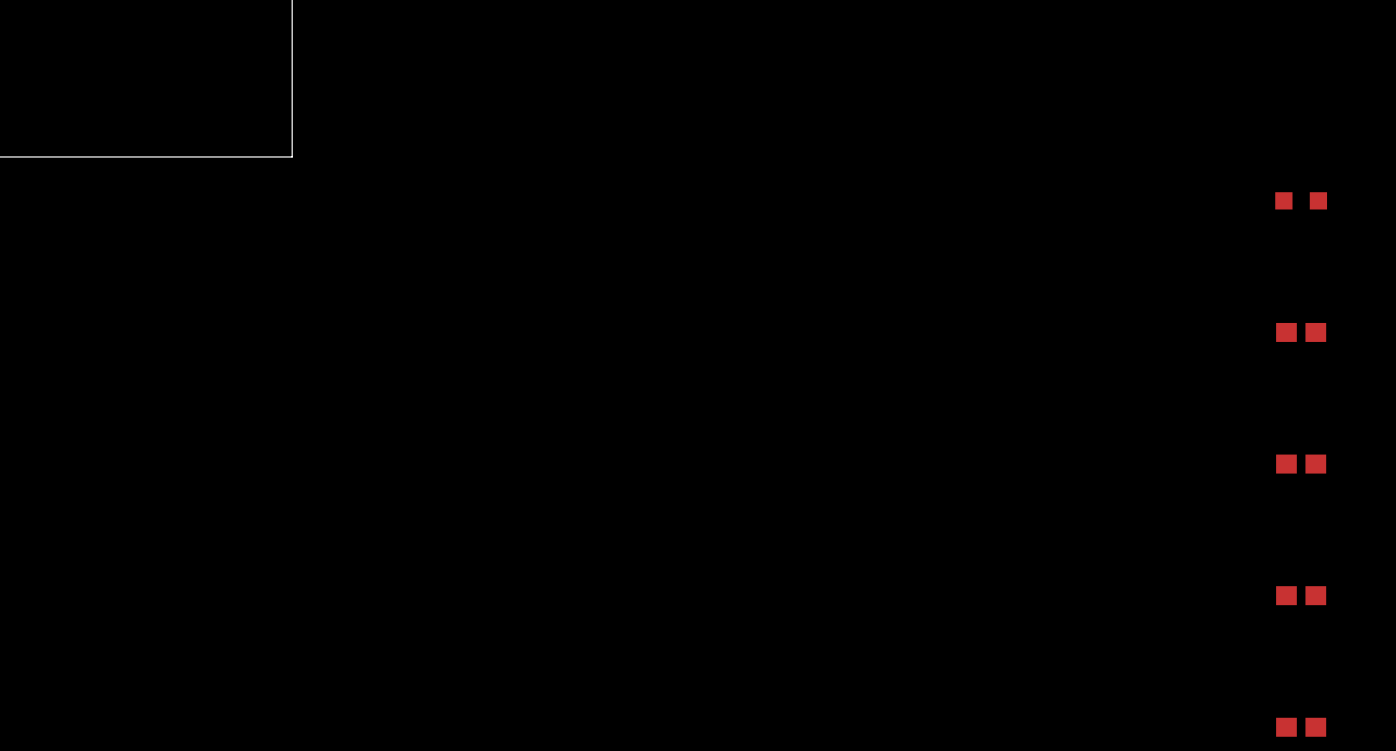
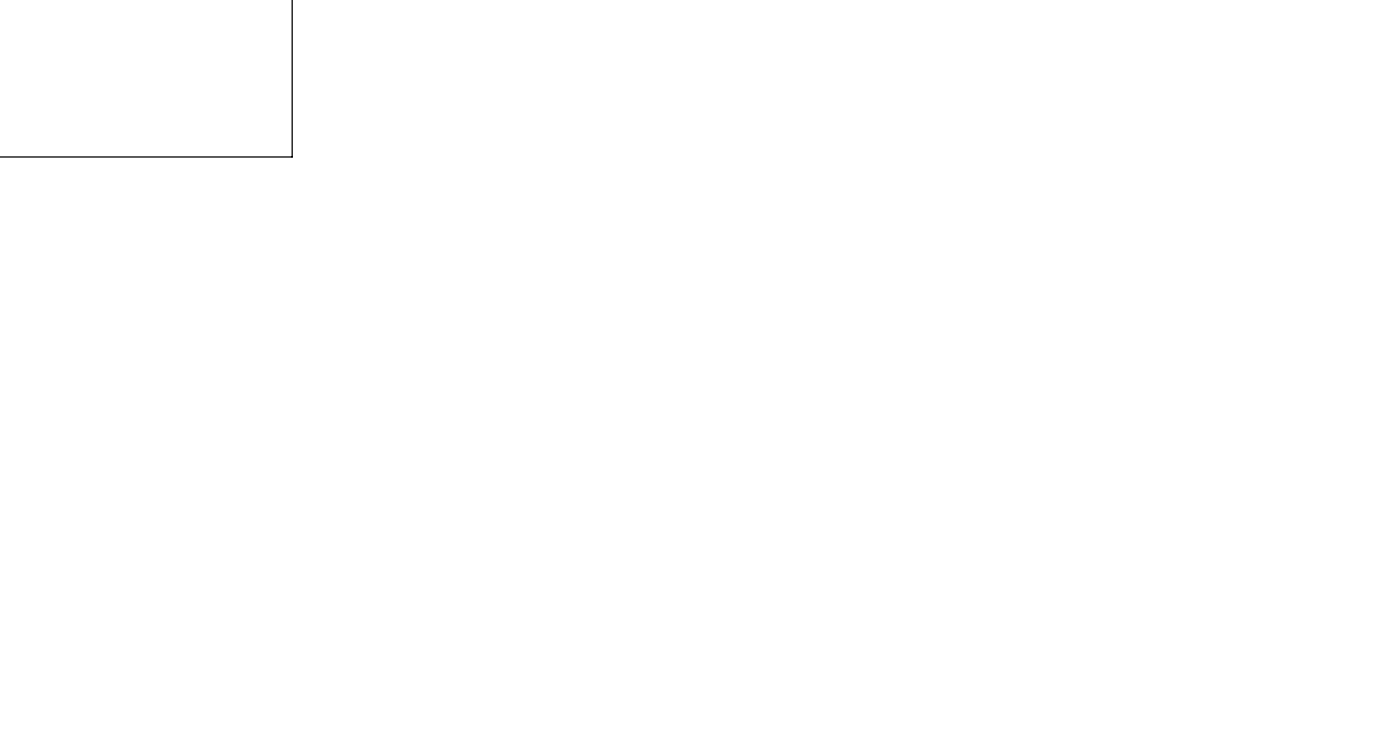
part: (1301, 200) -> none
part: (1301, 332) -> none
part: (1301, 464) -> none
part: (1301, 595) -> none
part: (1301, 727) -> none

